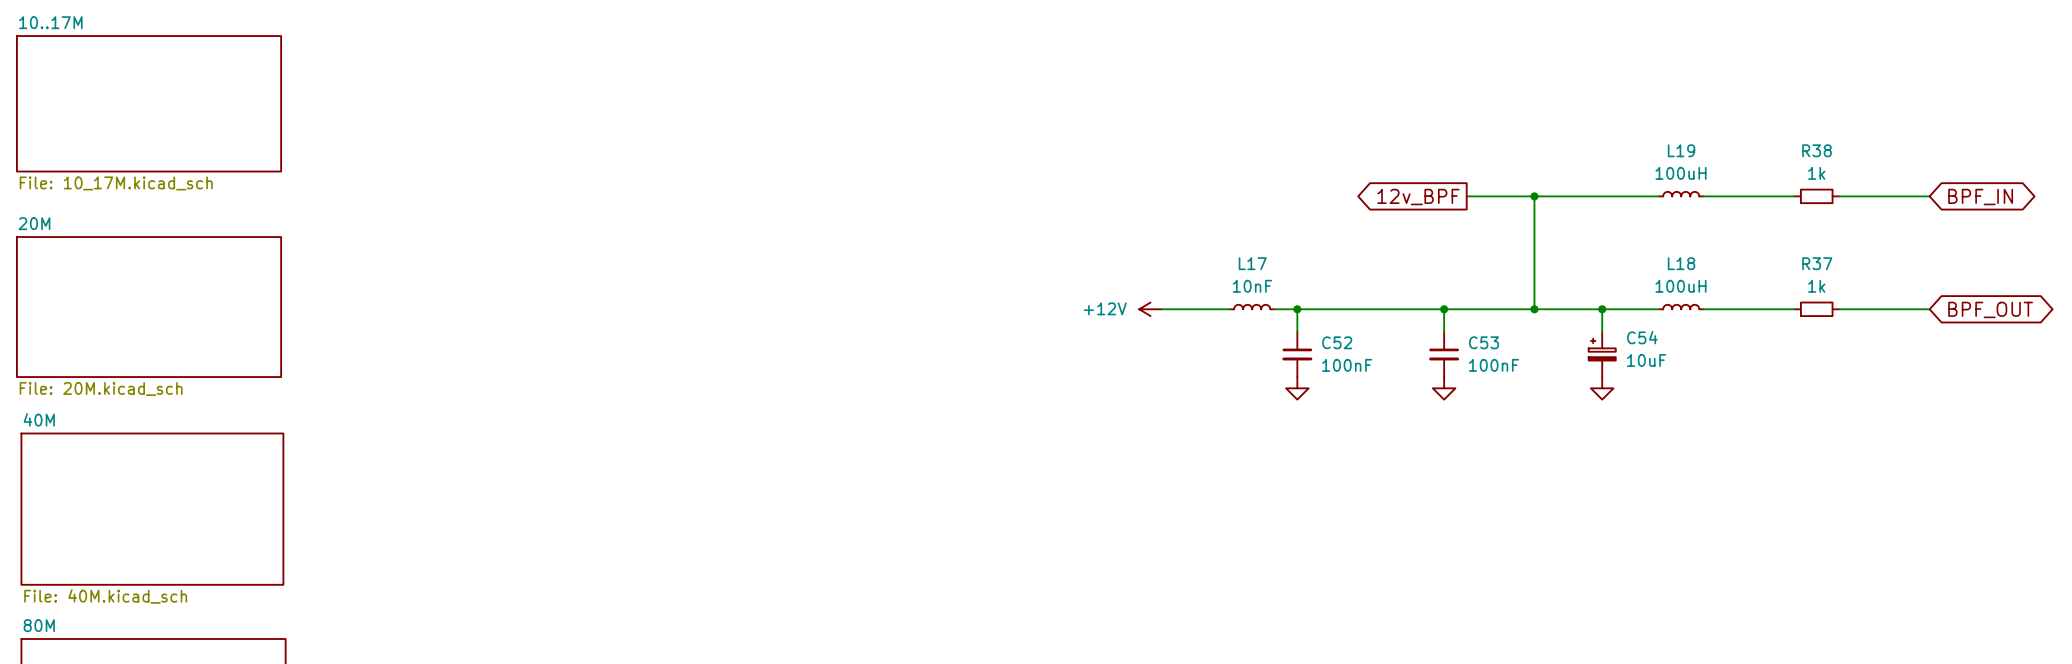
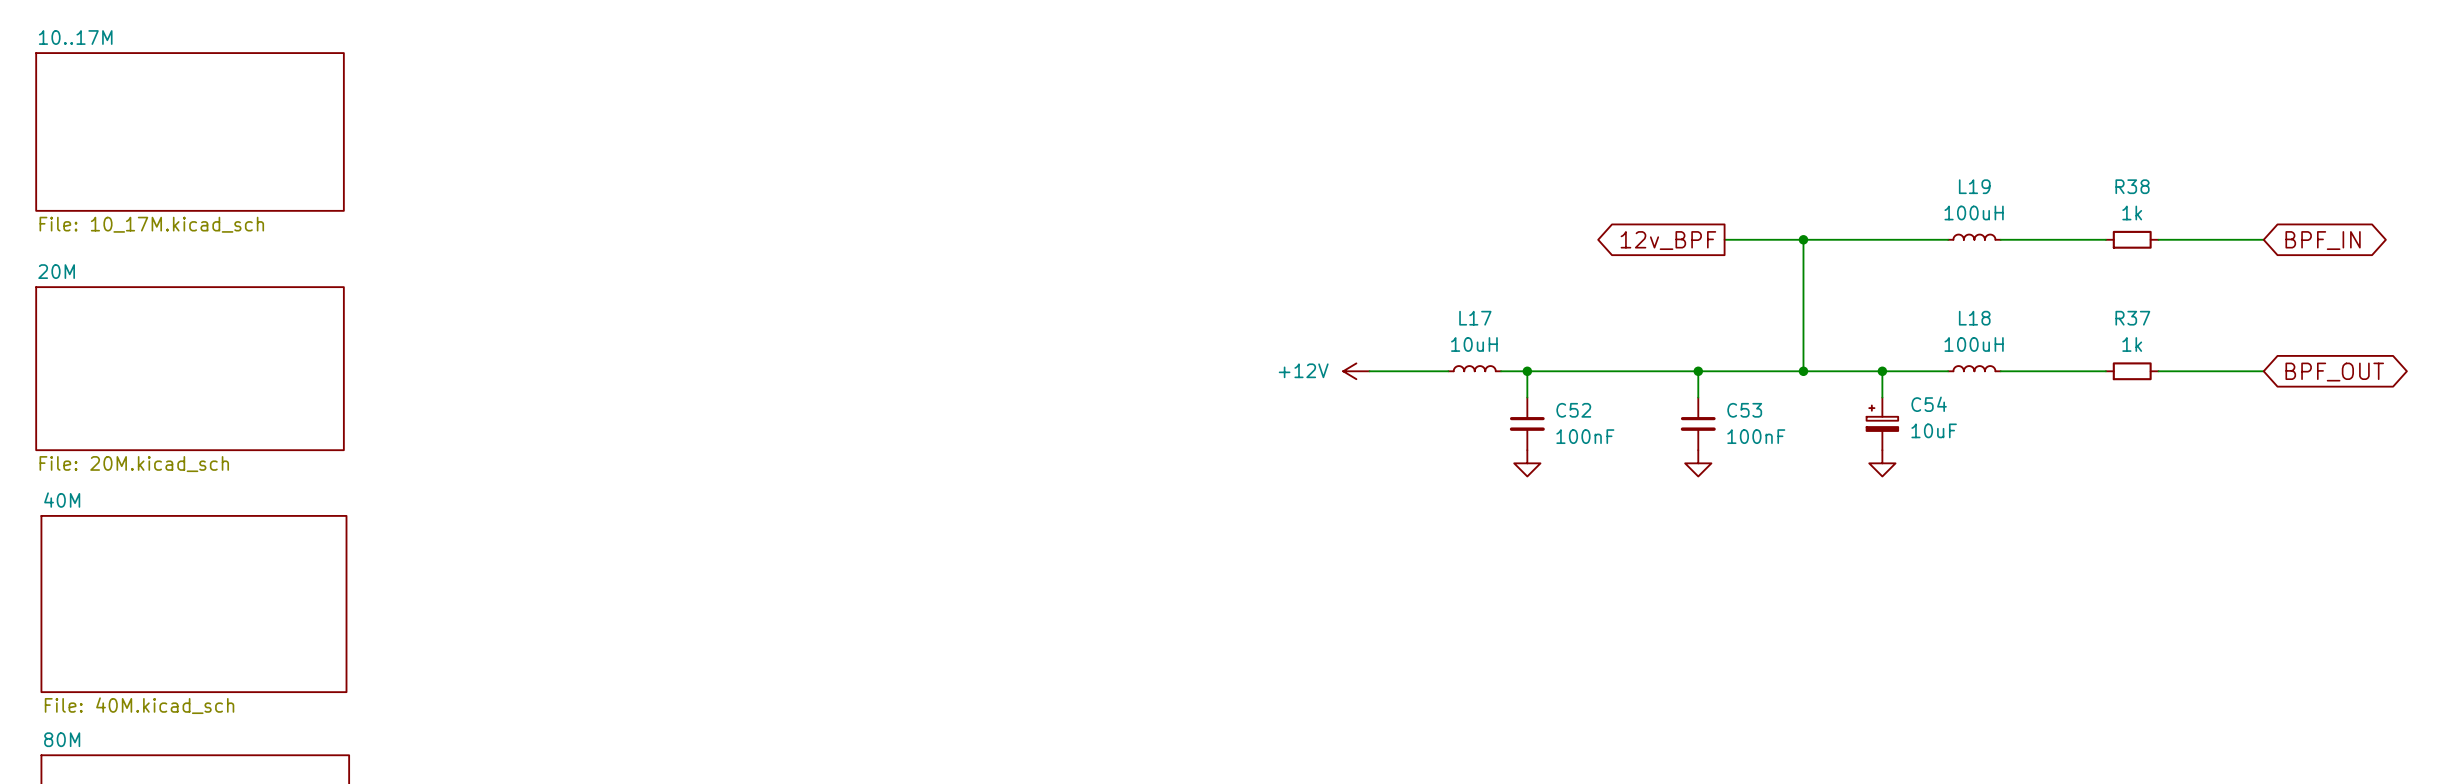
L17 value: 10nF (1252, 286) -> 10uH (1474, 344)

